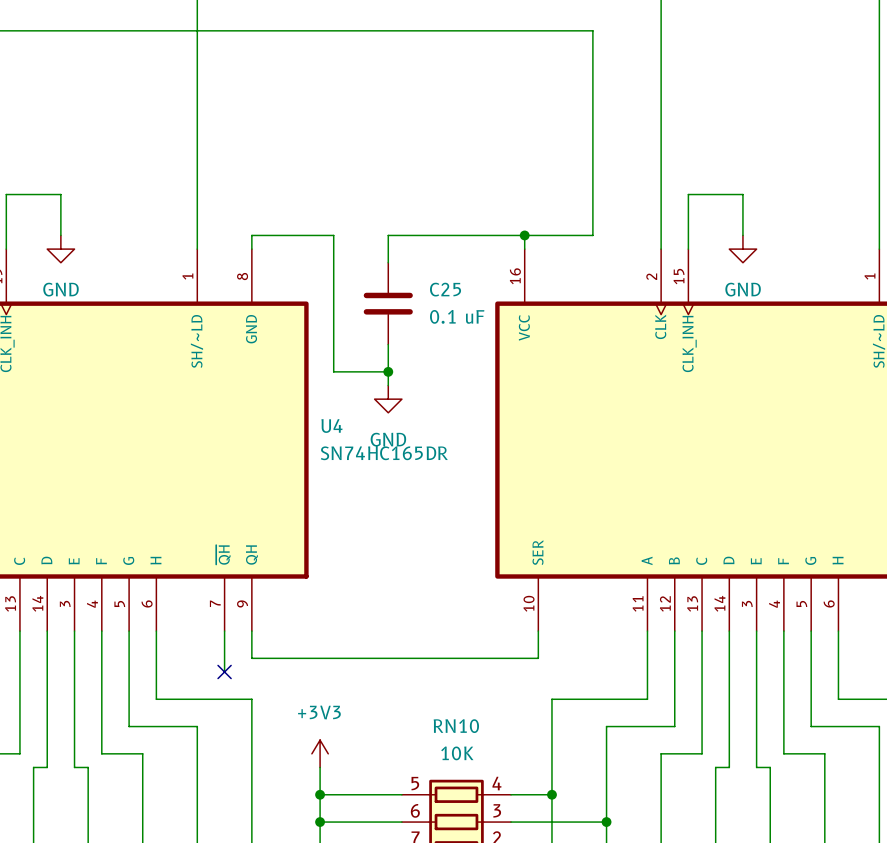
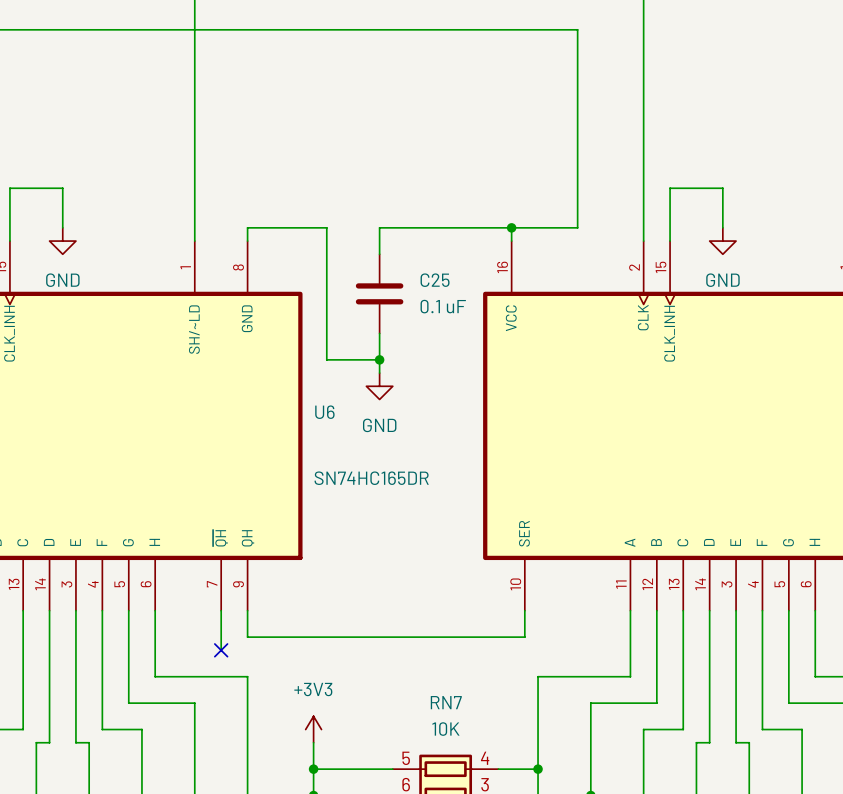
U4 name: U4 (331, 426) -> U6 (324, 412)
U4 value position: SN74HC165DR (384, 453) -> SN74HC165DR (371, 478)
RN10 name: RN10 (456, 726) -> RN7 (446, 702)

